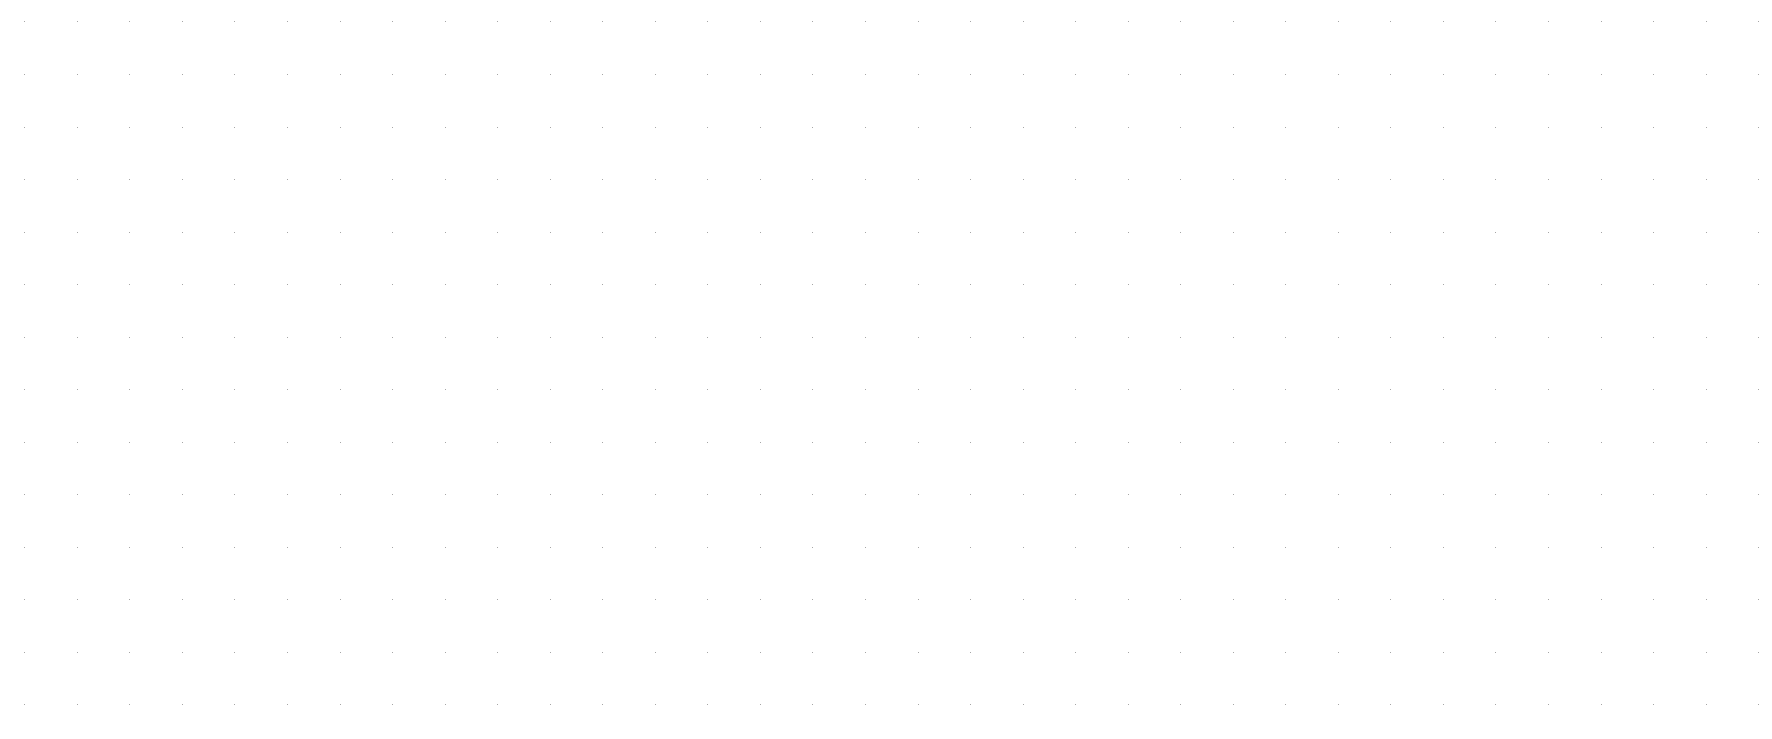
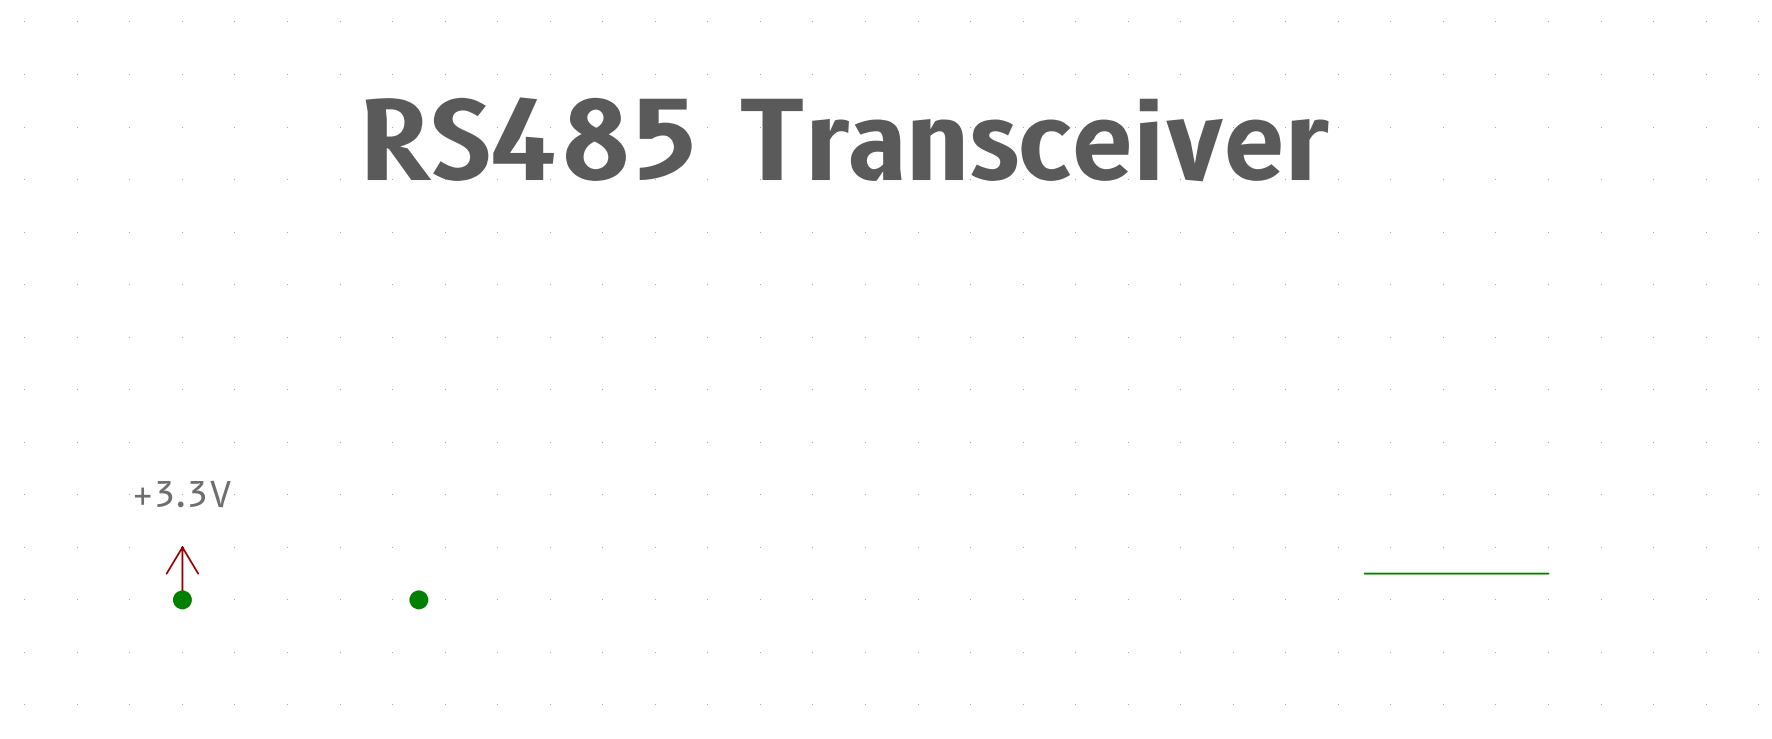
text: none -> RS485 Transceiver (847, 139)
power symbol: none -> +3.3V (182, 573)
wire: none -> (1364, 573) (1548, 573)
junction: none -> (182, 599)
junction: none -> (418, 599)

